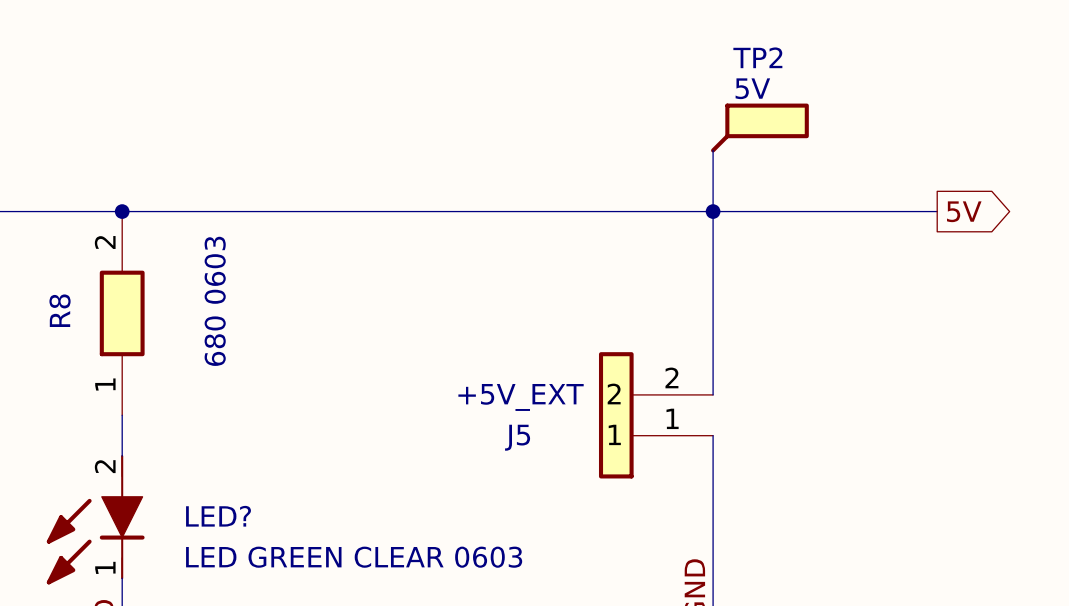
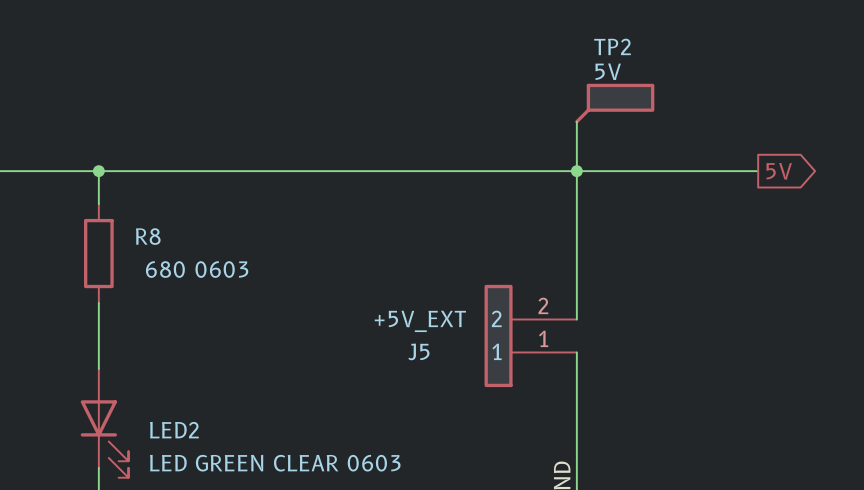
R8 symbol: [99, 211, 145, 416] -> [84, 204, 114, 304]
R8 value position: 680 0603 (215, 301) -> 680 0603 (197, 269)
R8 name position: R8 (60, 310) -> R8 (148, 236)
LED?: LED GREEN CLEAR 0603 (95, 519) -> none
LED2: none -> LED GREEN CLEAR 0603 (104, 423)

